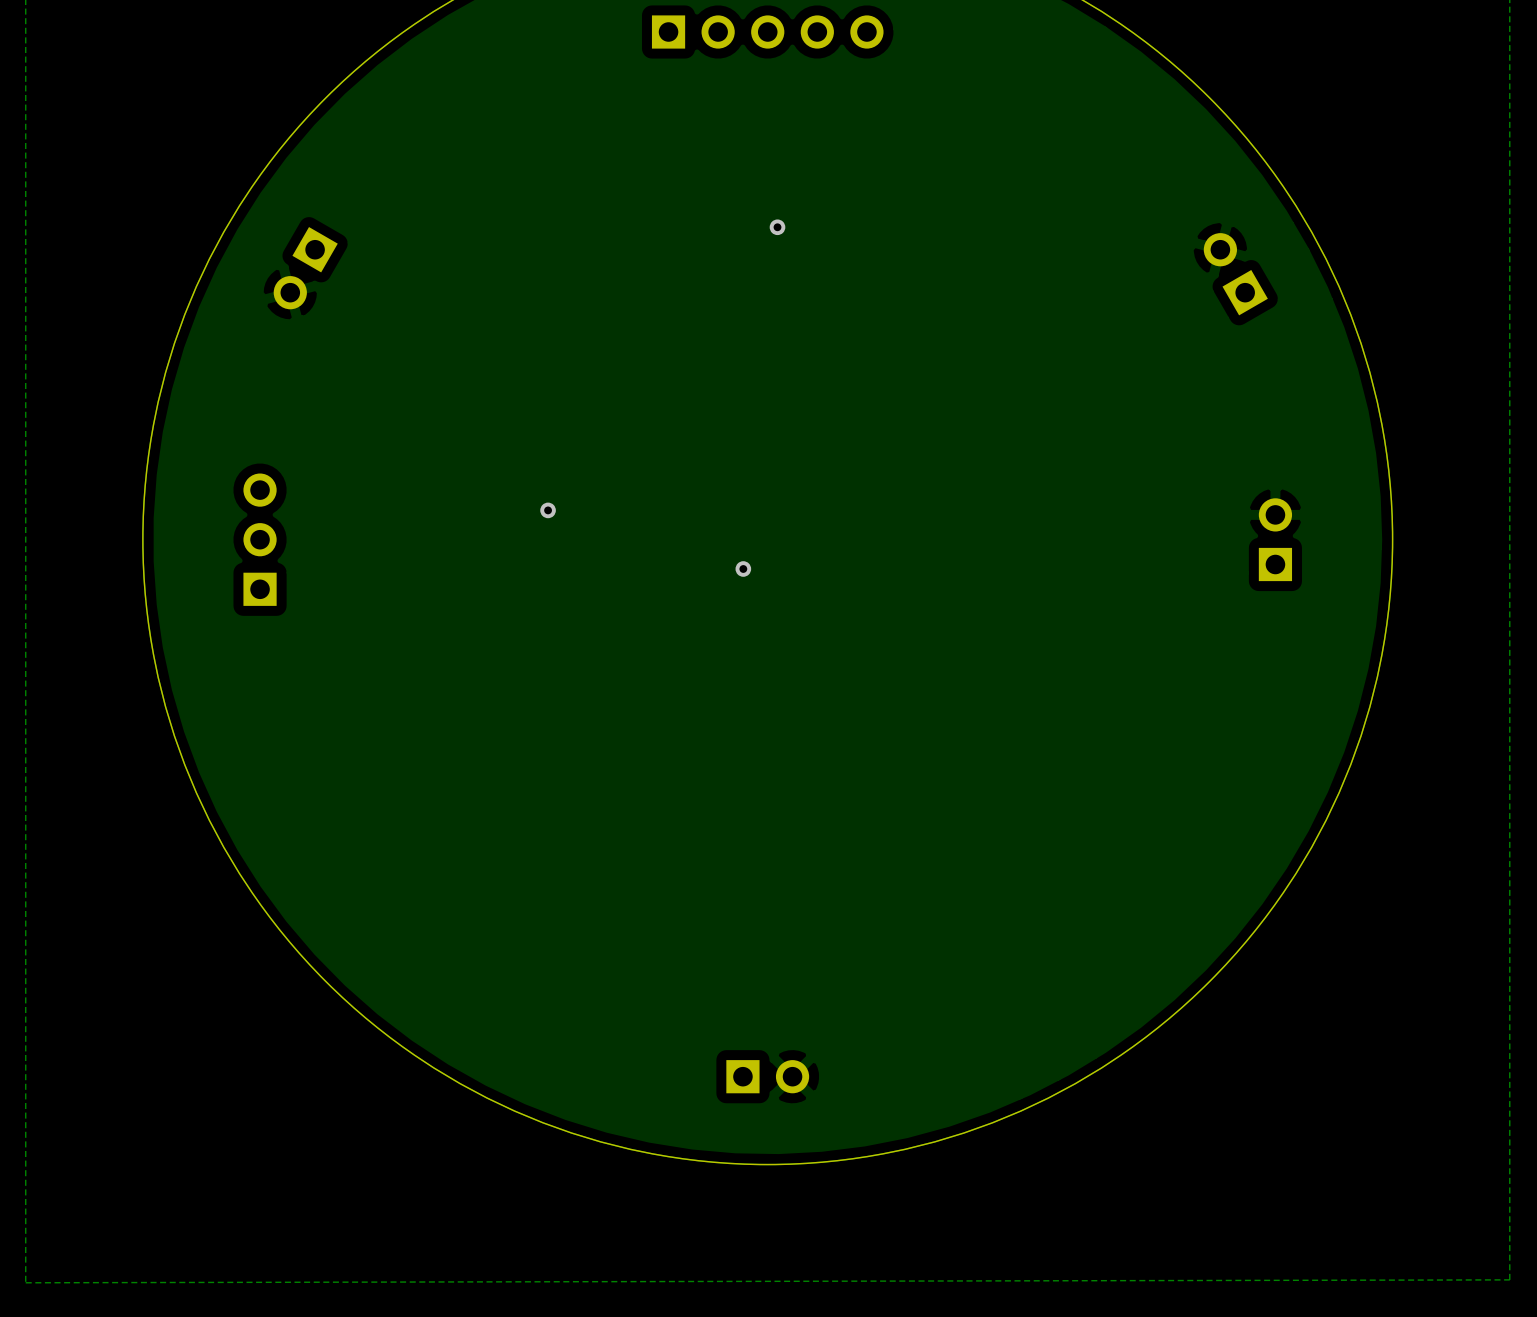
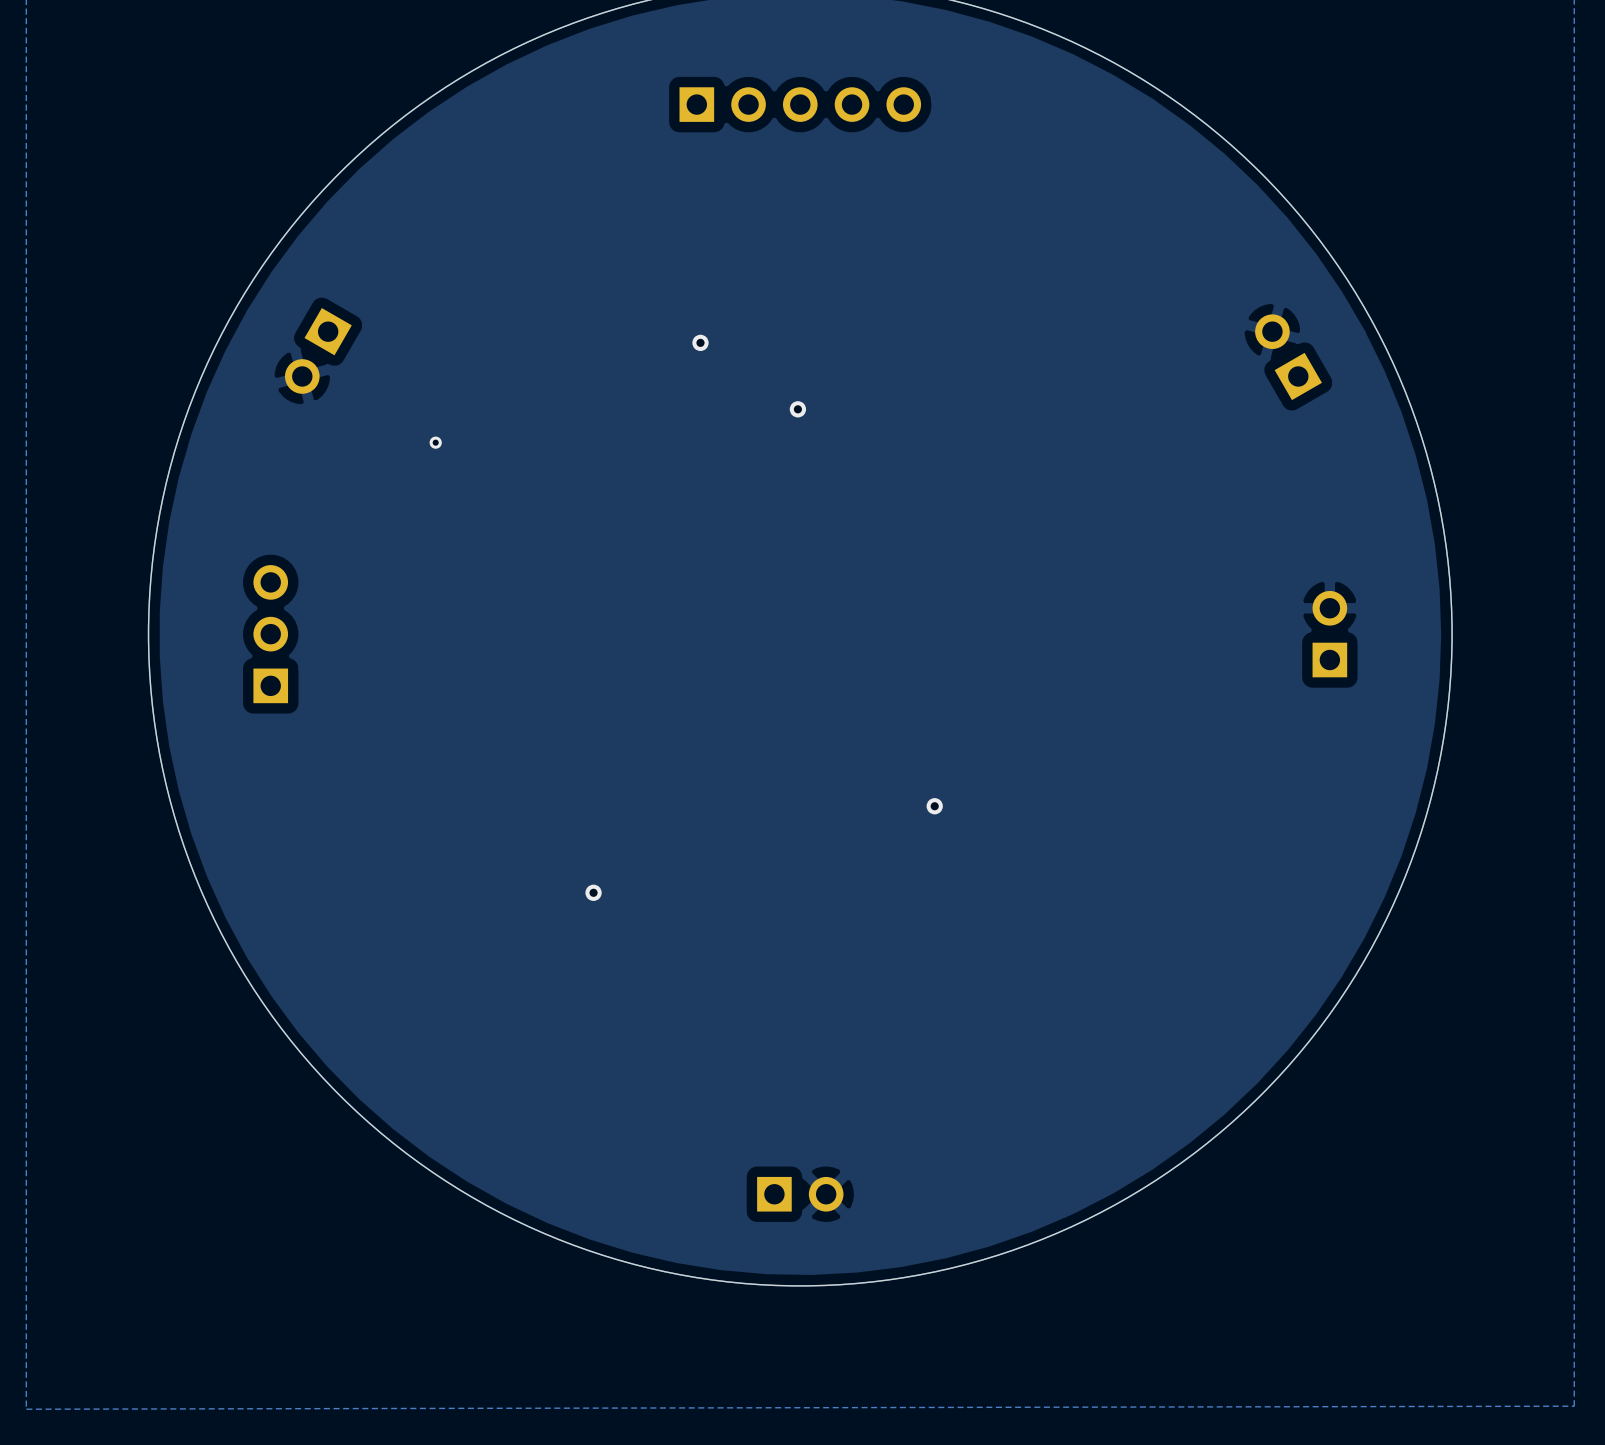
via: (777, 227) -> none
via: none -> (700, 342)
via: none -> (797, 409)
via: none -> (435, 442)
via: (548, 510) -> none
via: (743, 568) -> none
via: none -> (934, 806)
via: none -> (593, 892)

